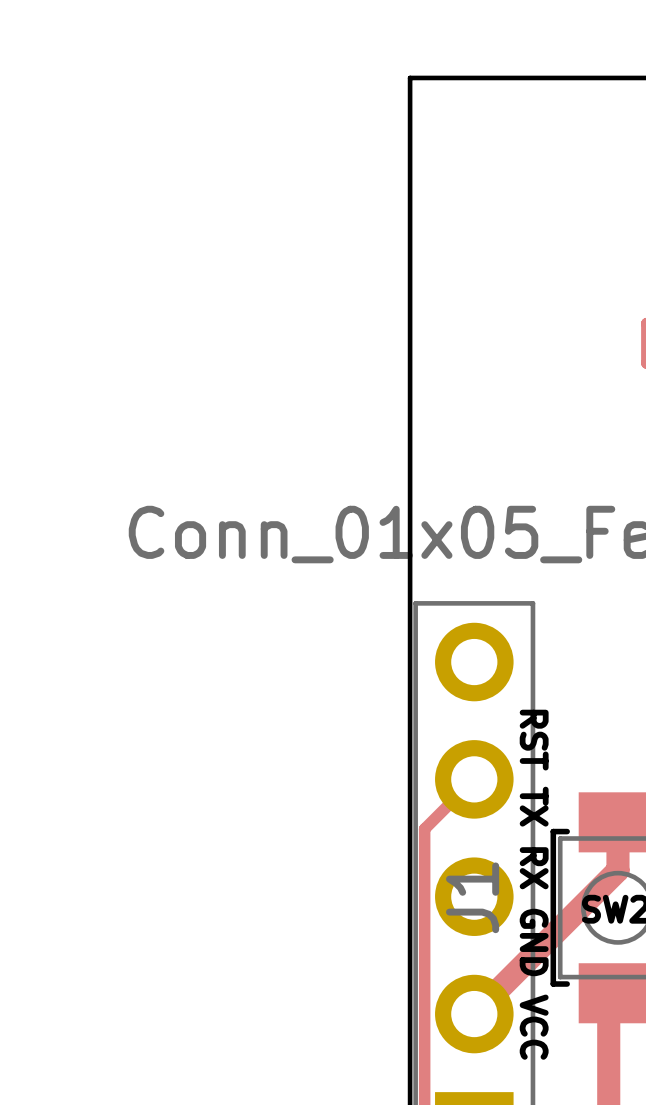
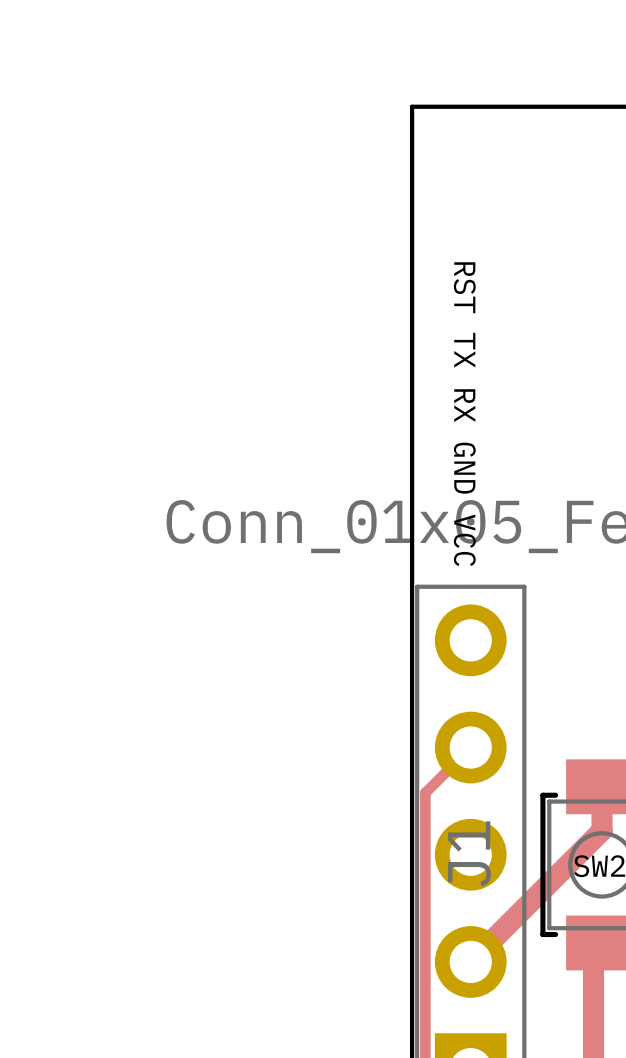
text position: RST TX RX GND VCC (534, 884) -> RST TX RX GND VCC (464, 414)

